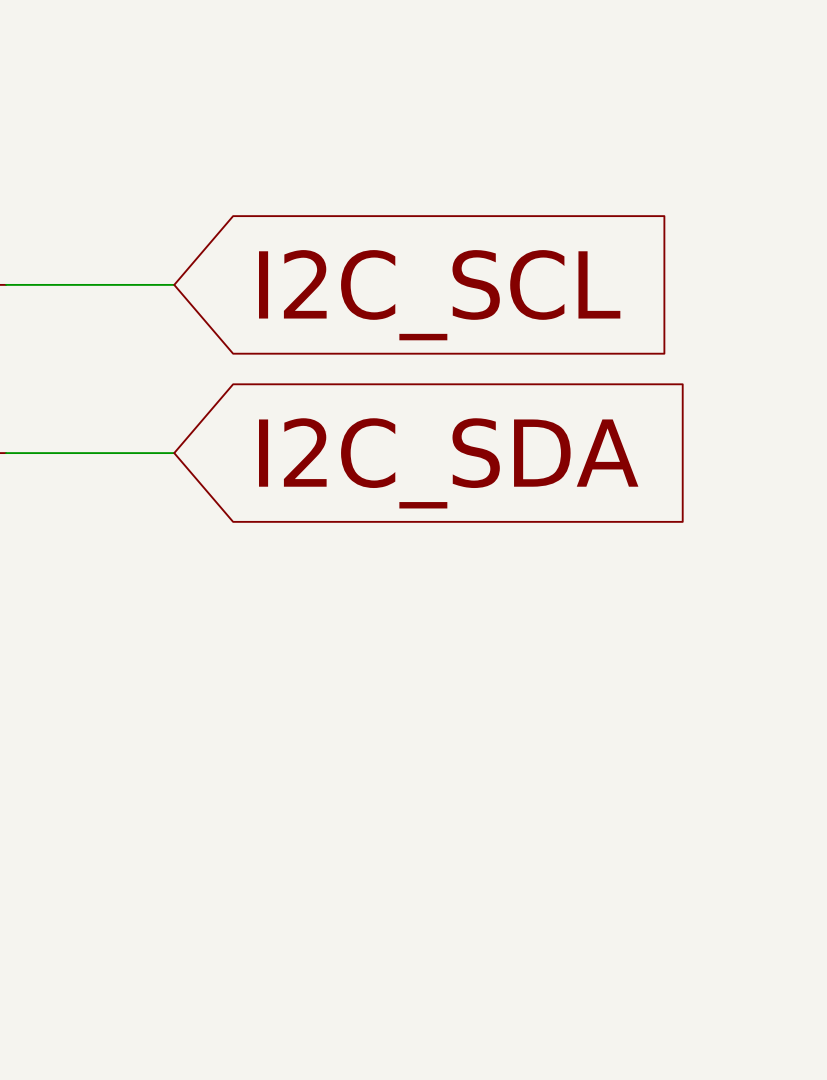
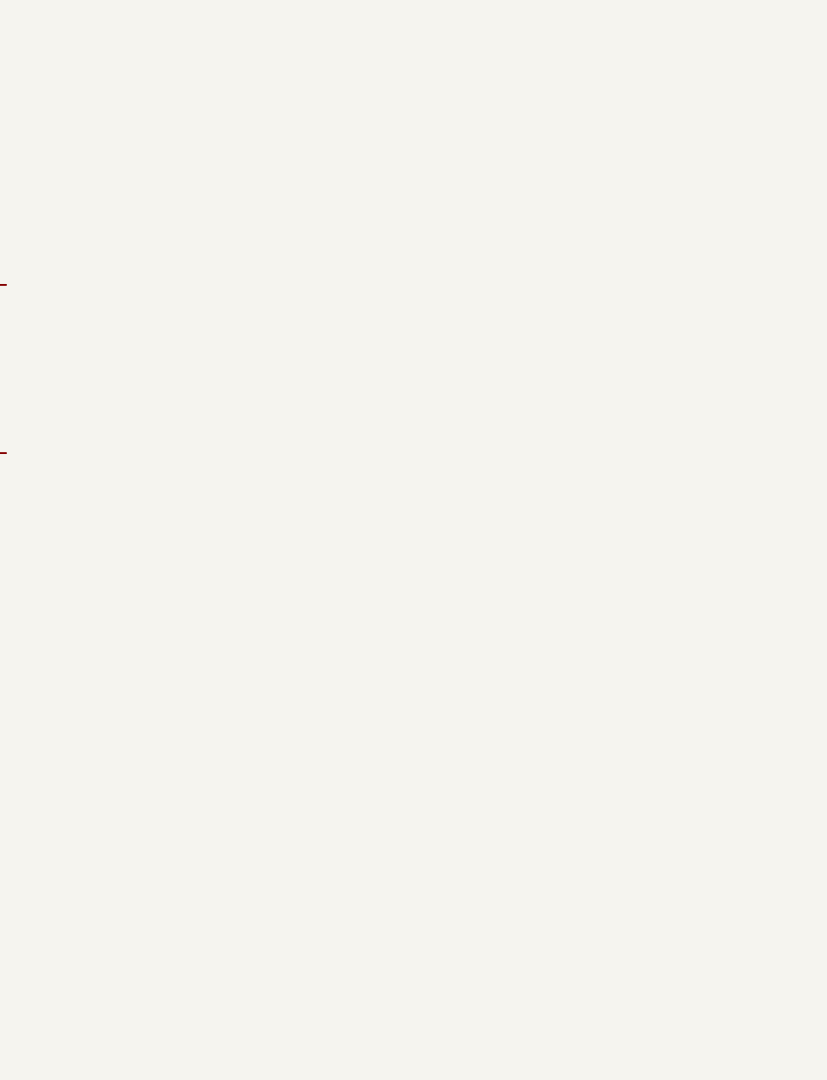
wire: (6, 284) (174, 284) -> none
global label: I2C_SCL (439, 295) -> none
wire: (6, 453) (174, 453) -> none
global label: I2C_SDA (448, 463) -> none

